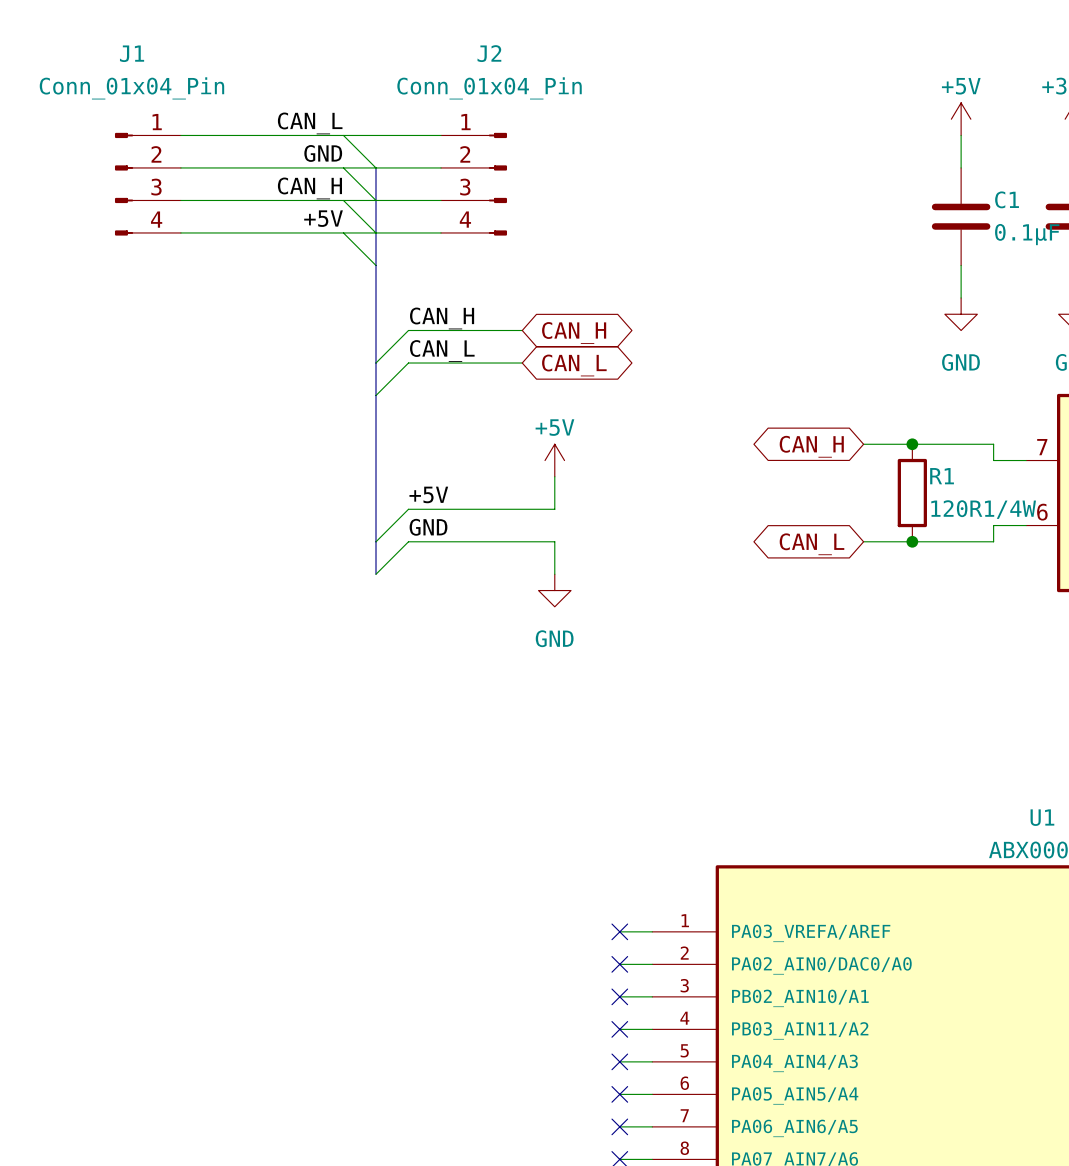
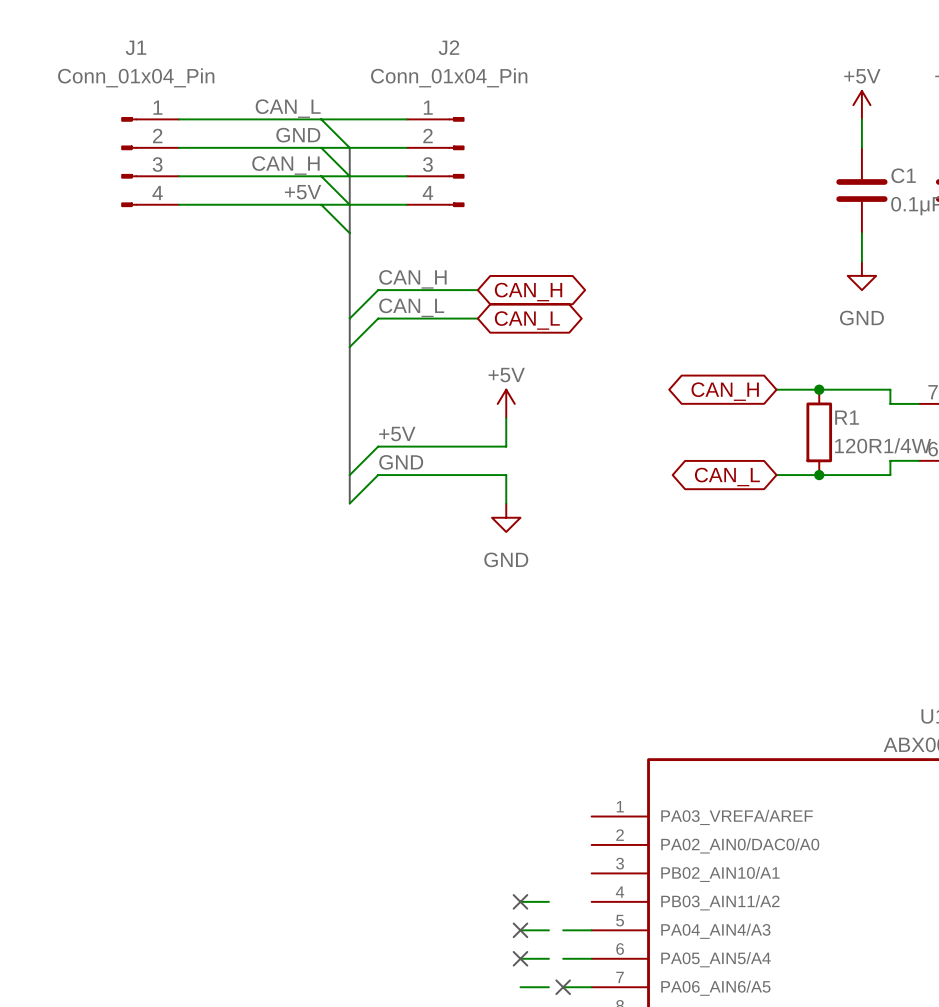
wire: (619, 931) (652, 931) -> (520, 901) (548, 901)
no-connect mark: (619, 931) -> none
wire: (619, 964) (652, 964) -> (520, 930) (548, 930)
no-connect mark: (619, 964) -> none
wire: (619, 996) (652, 996) -> (520, 958) (548, 958)
no-connect mark: (619, 996) -> none
no-connect mark: none -> (520, 901)
wire: (619, 1029) (652, 1029) -> (520, 987) (548, 987)
no-connect mark: (619, 1029) -> none
no-connect mark: none -> (520, 930)
no-connect mark: (619, 1061) -> none
no-connect mark: none -> (520, 958)
no-connect mark: (619, 1094) -> none

